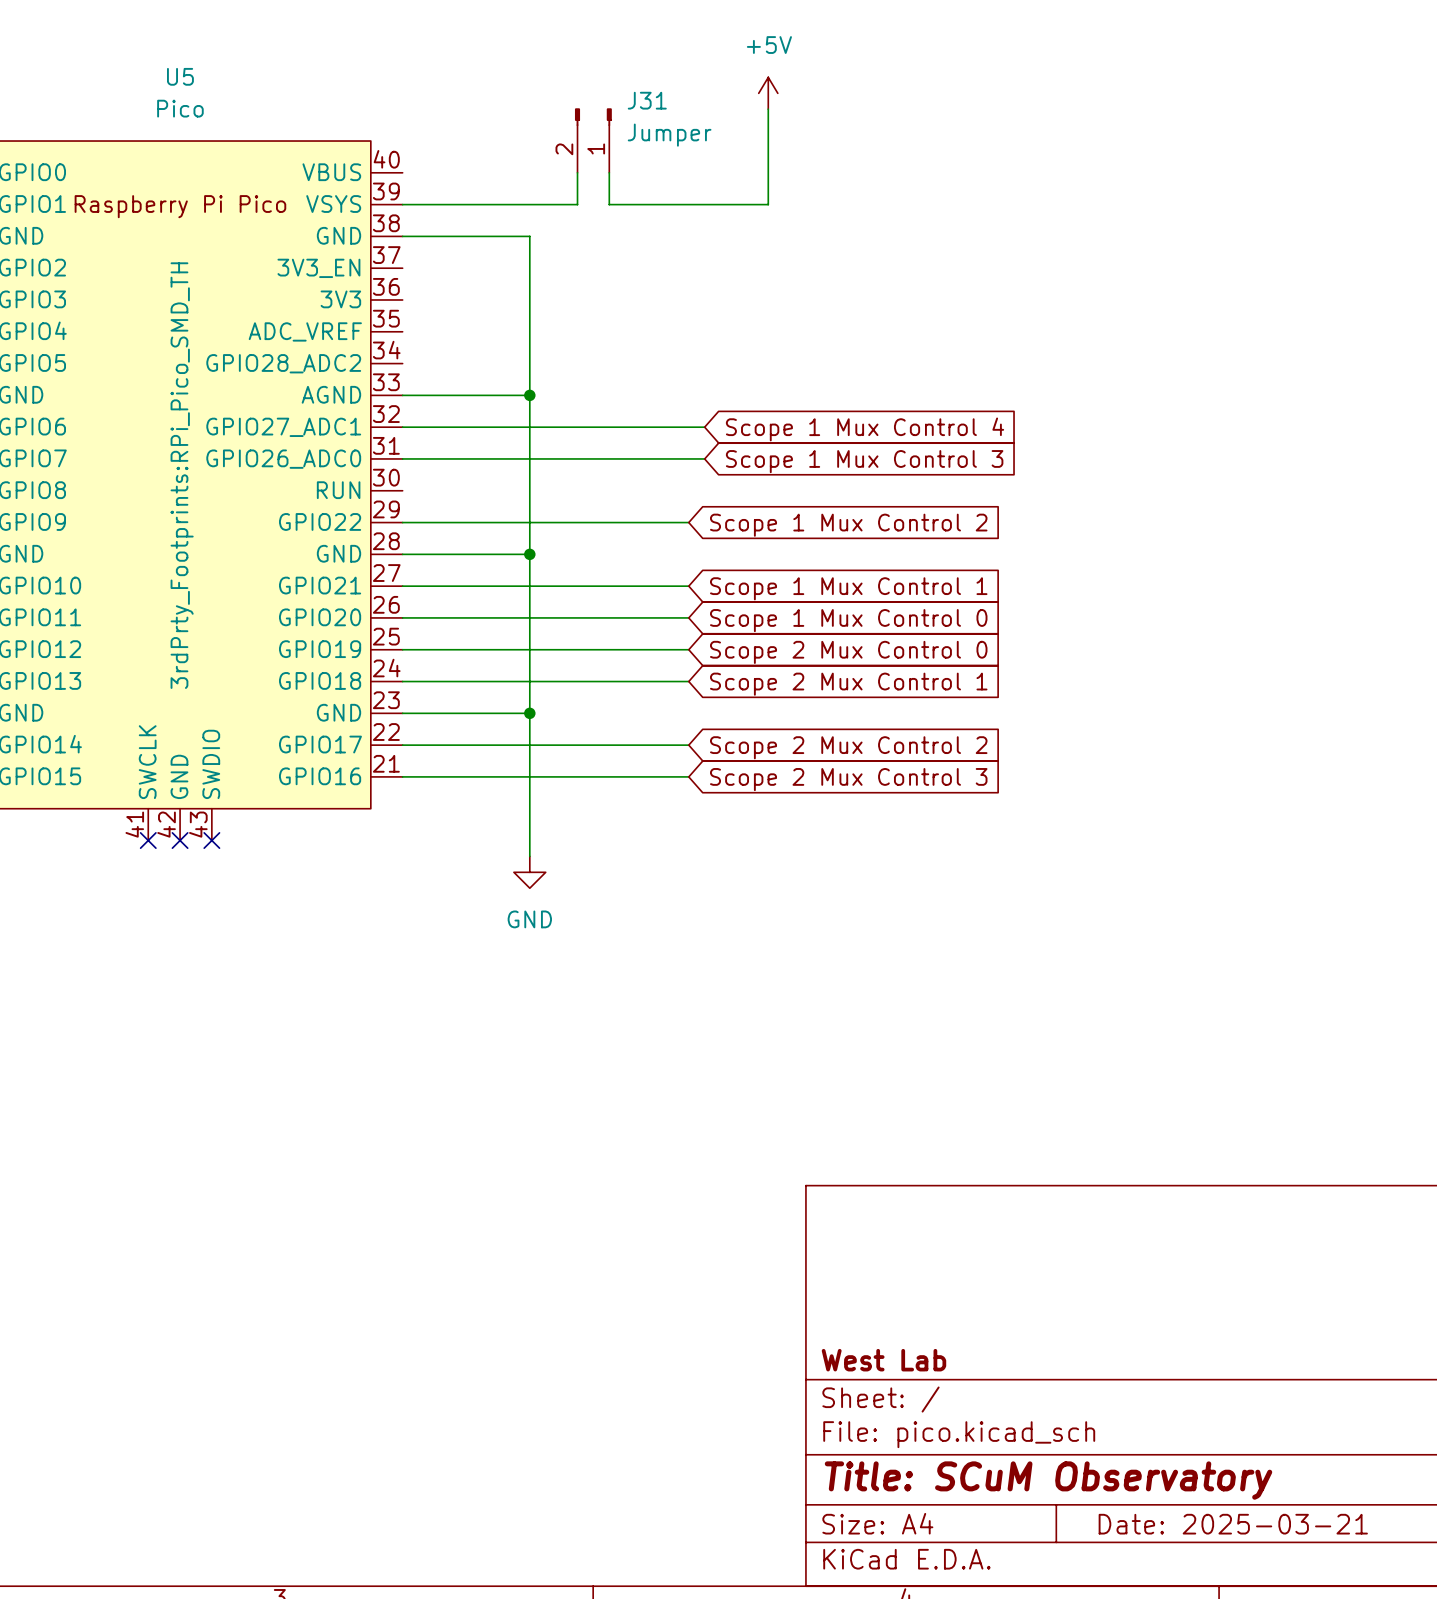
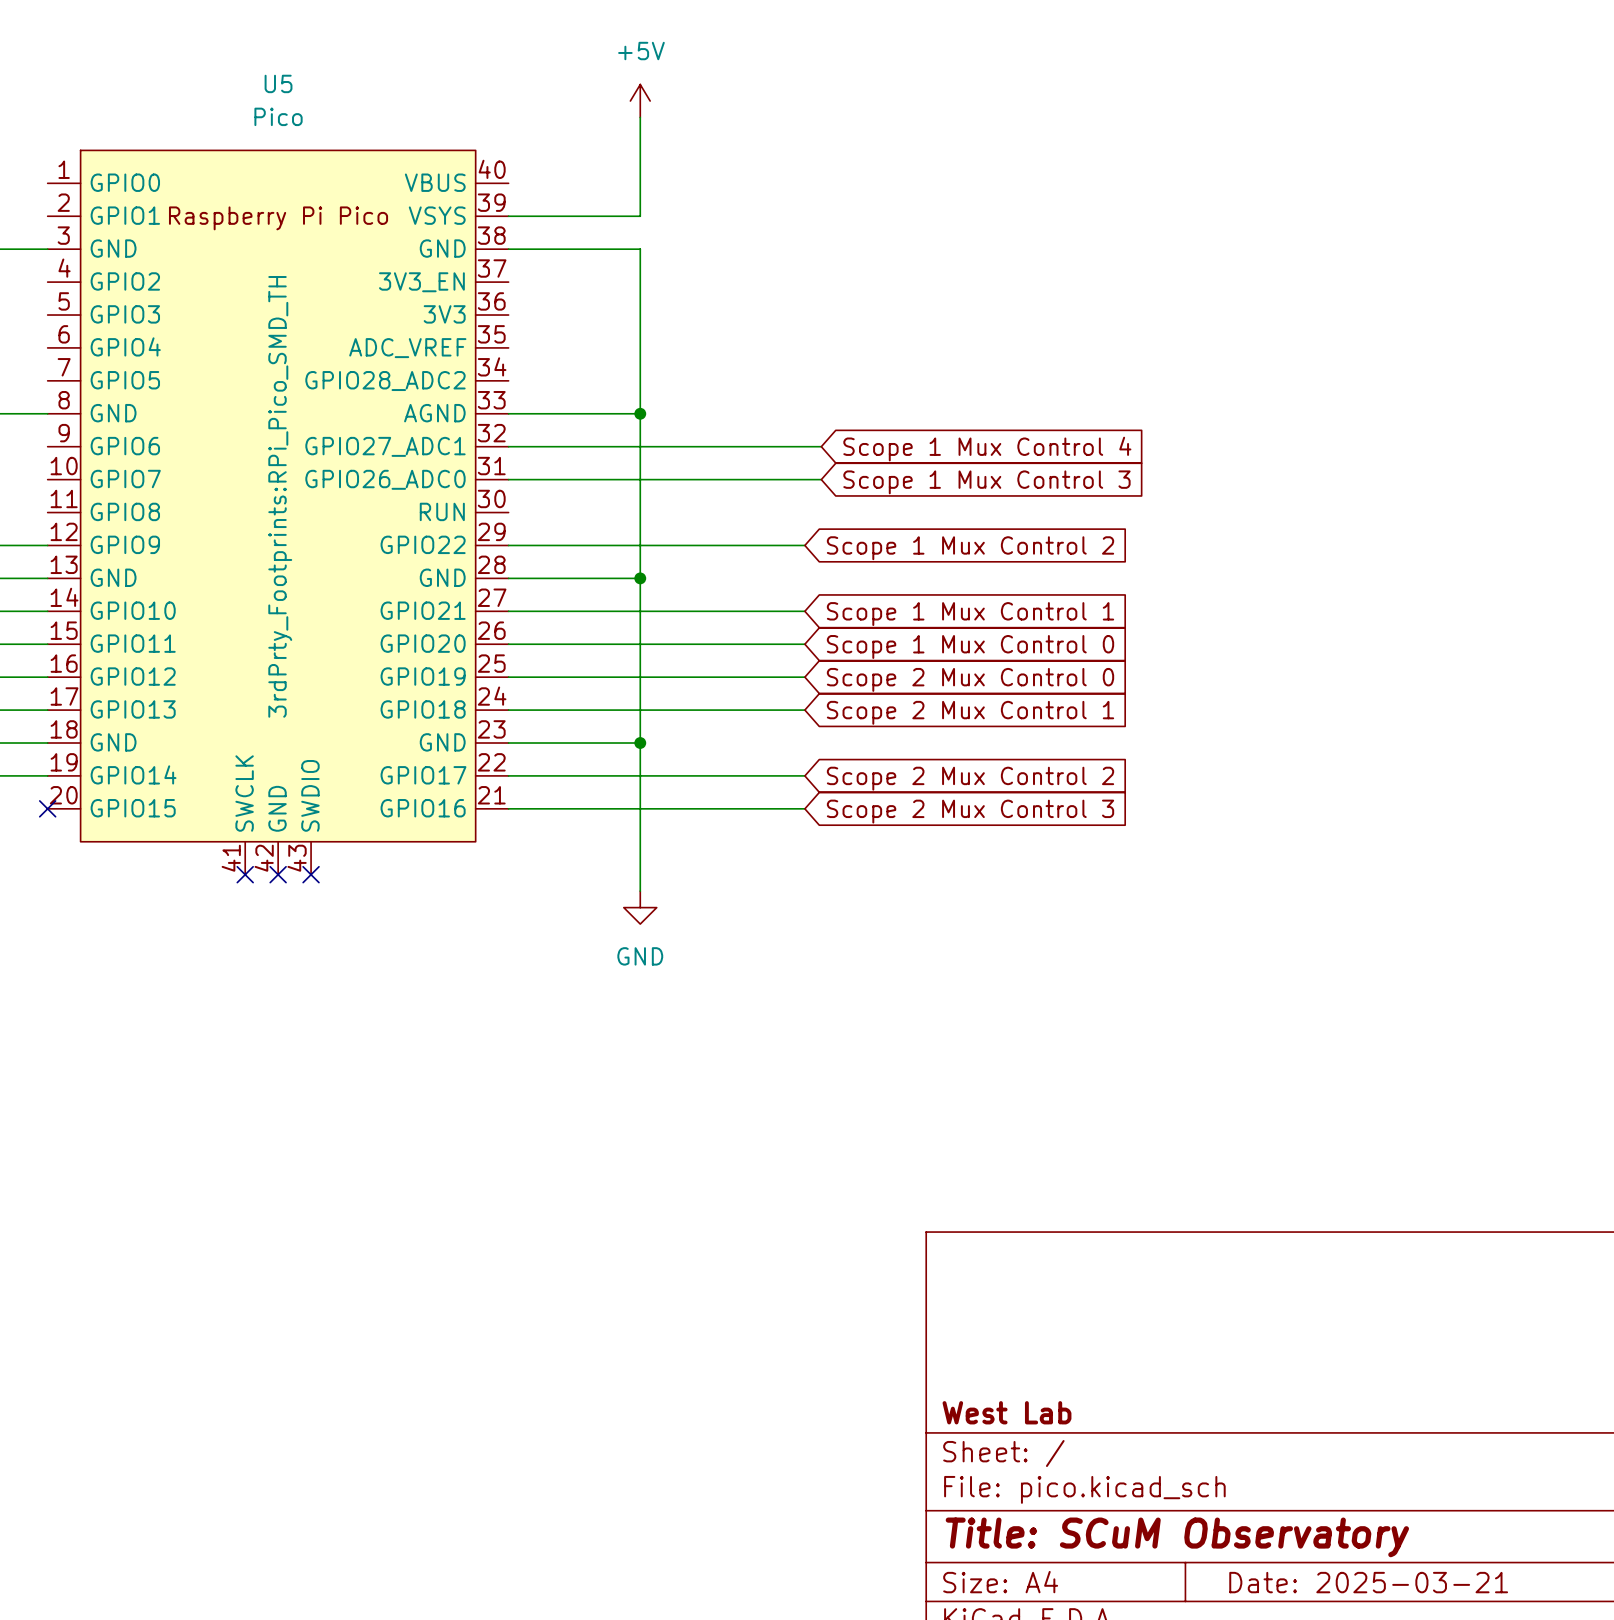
power symbol position: +5V (768, 93) -> +5V (640, 101)
wire: (768, 109) (768, 204) (609, 204) (609, 172) -> none
J31: Jumper (593, 140) -> none
wire: (577, 172) (577, 204) (529, 204) -> (640, 117) (640, 216)

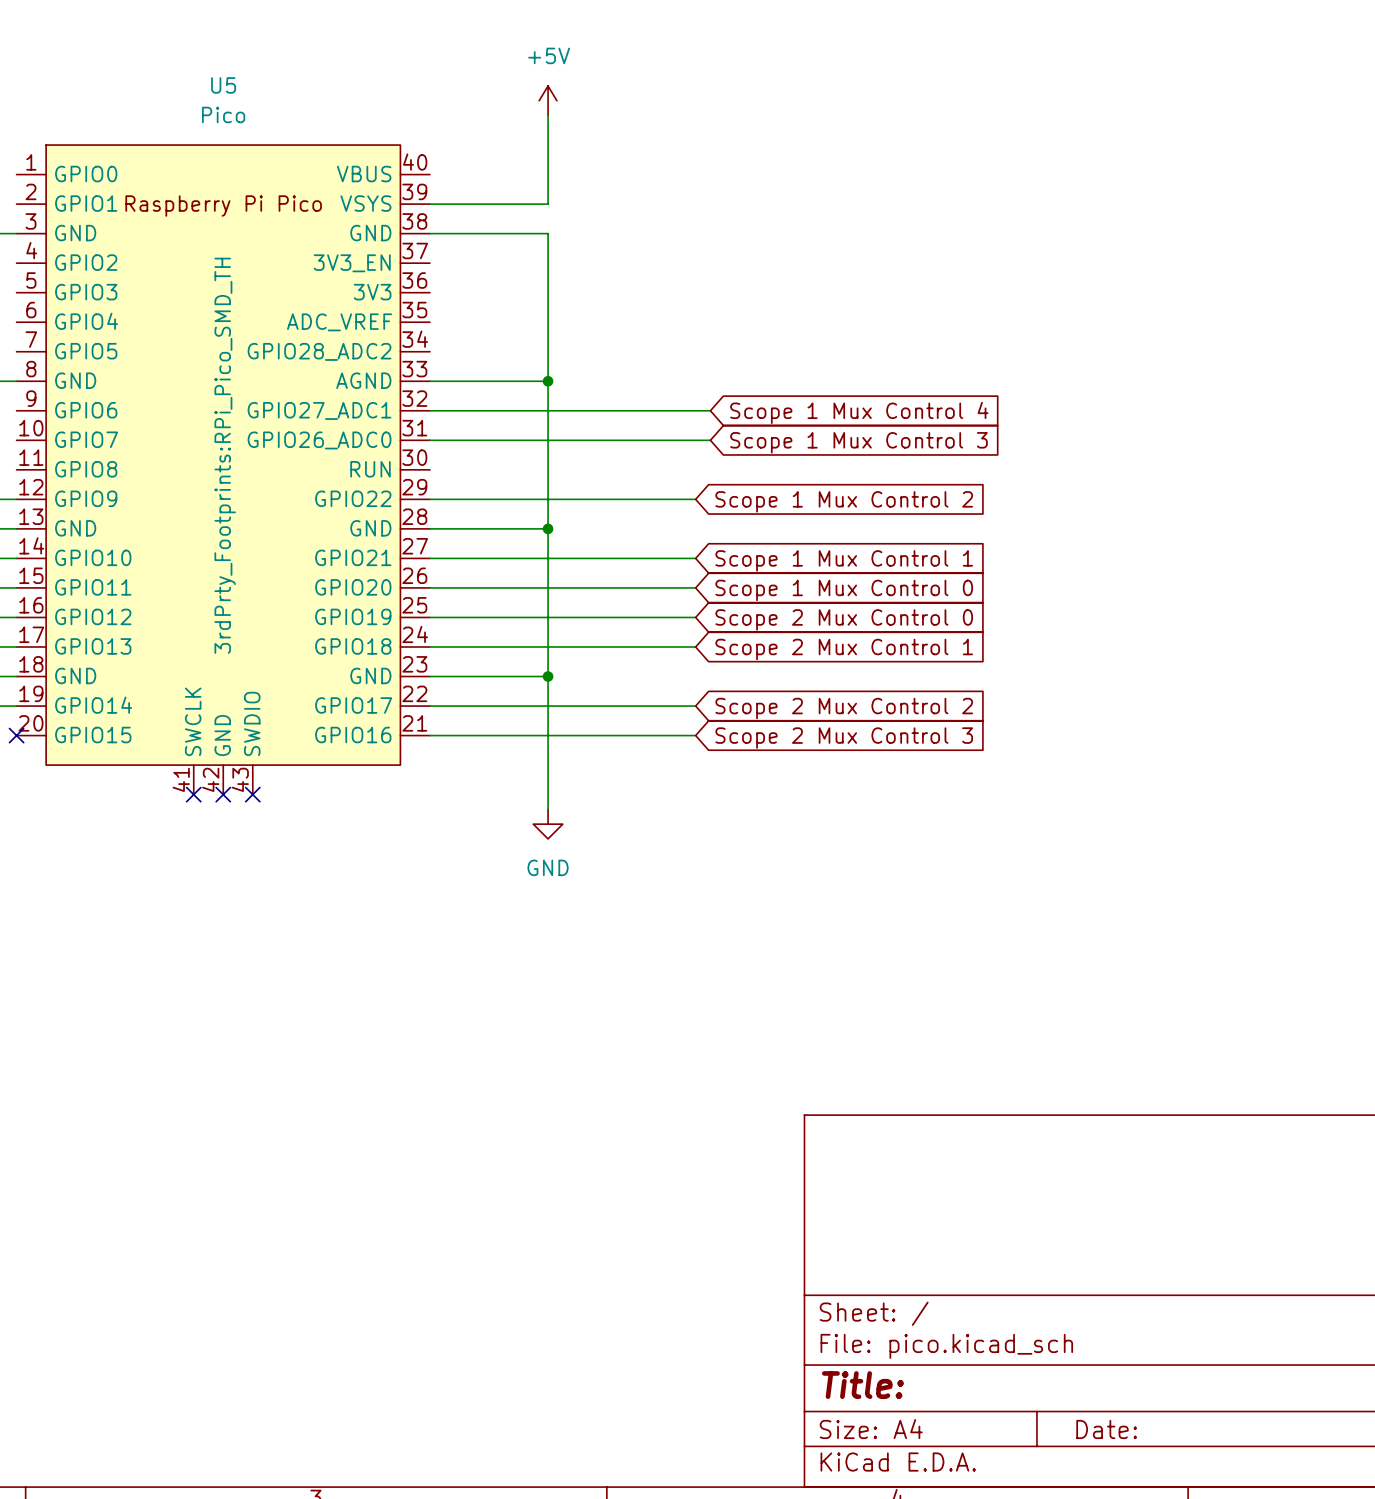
title block: West Lab (1006, 1412) -> none
title block: Title: SCuM Observatory (1177, 1537) -> Title: (862, 1385)
title block: Date: 2025-03-21 (1368, 1582) -> Date: (1106, 1429)

